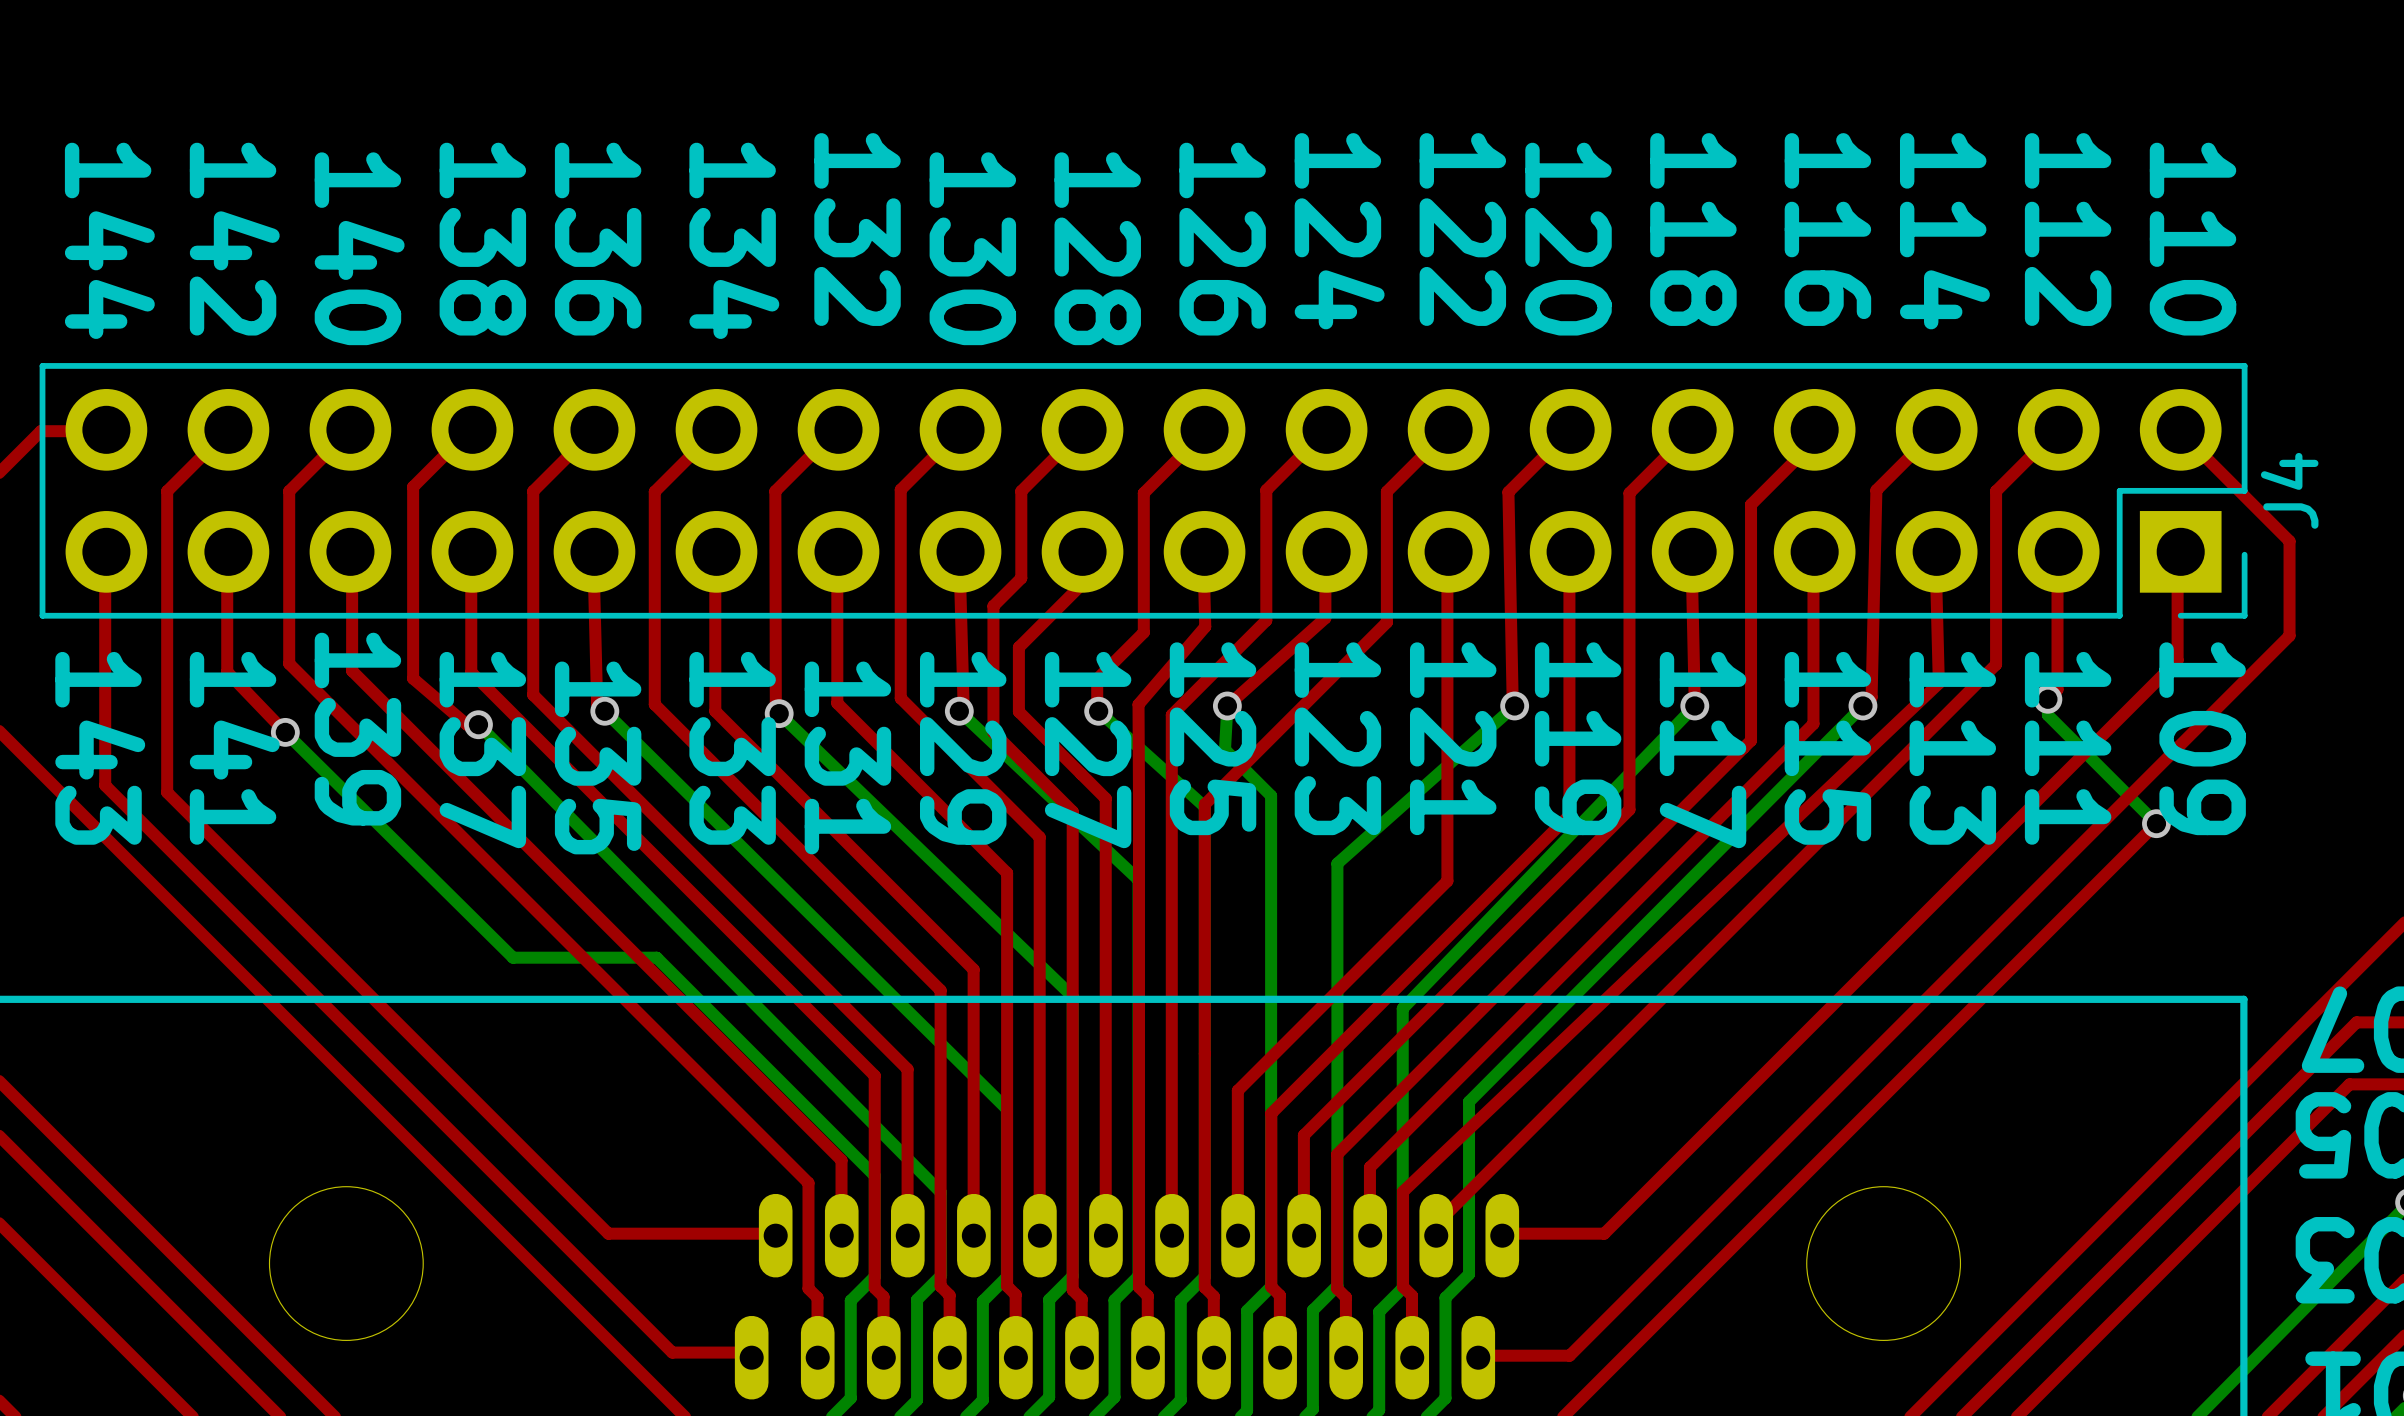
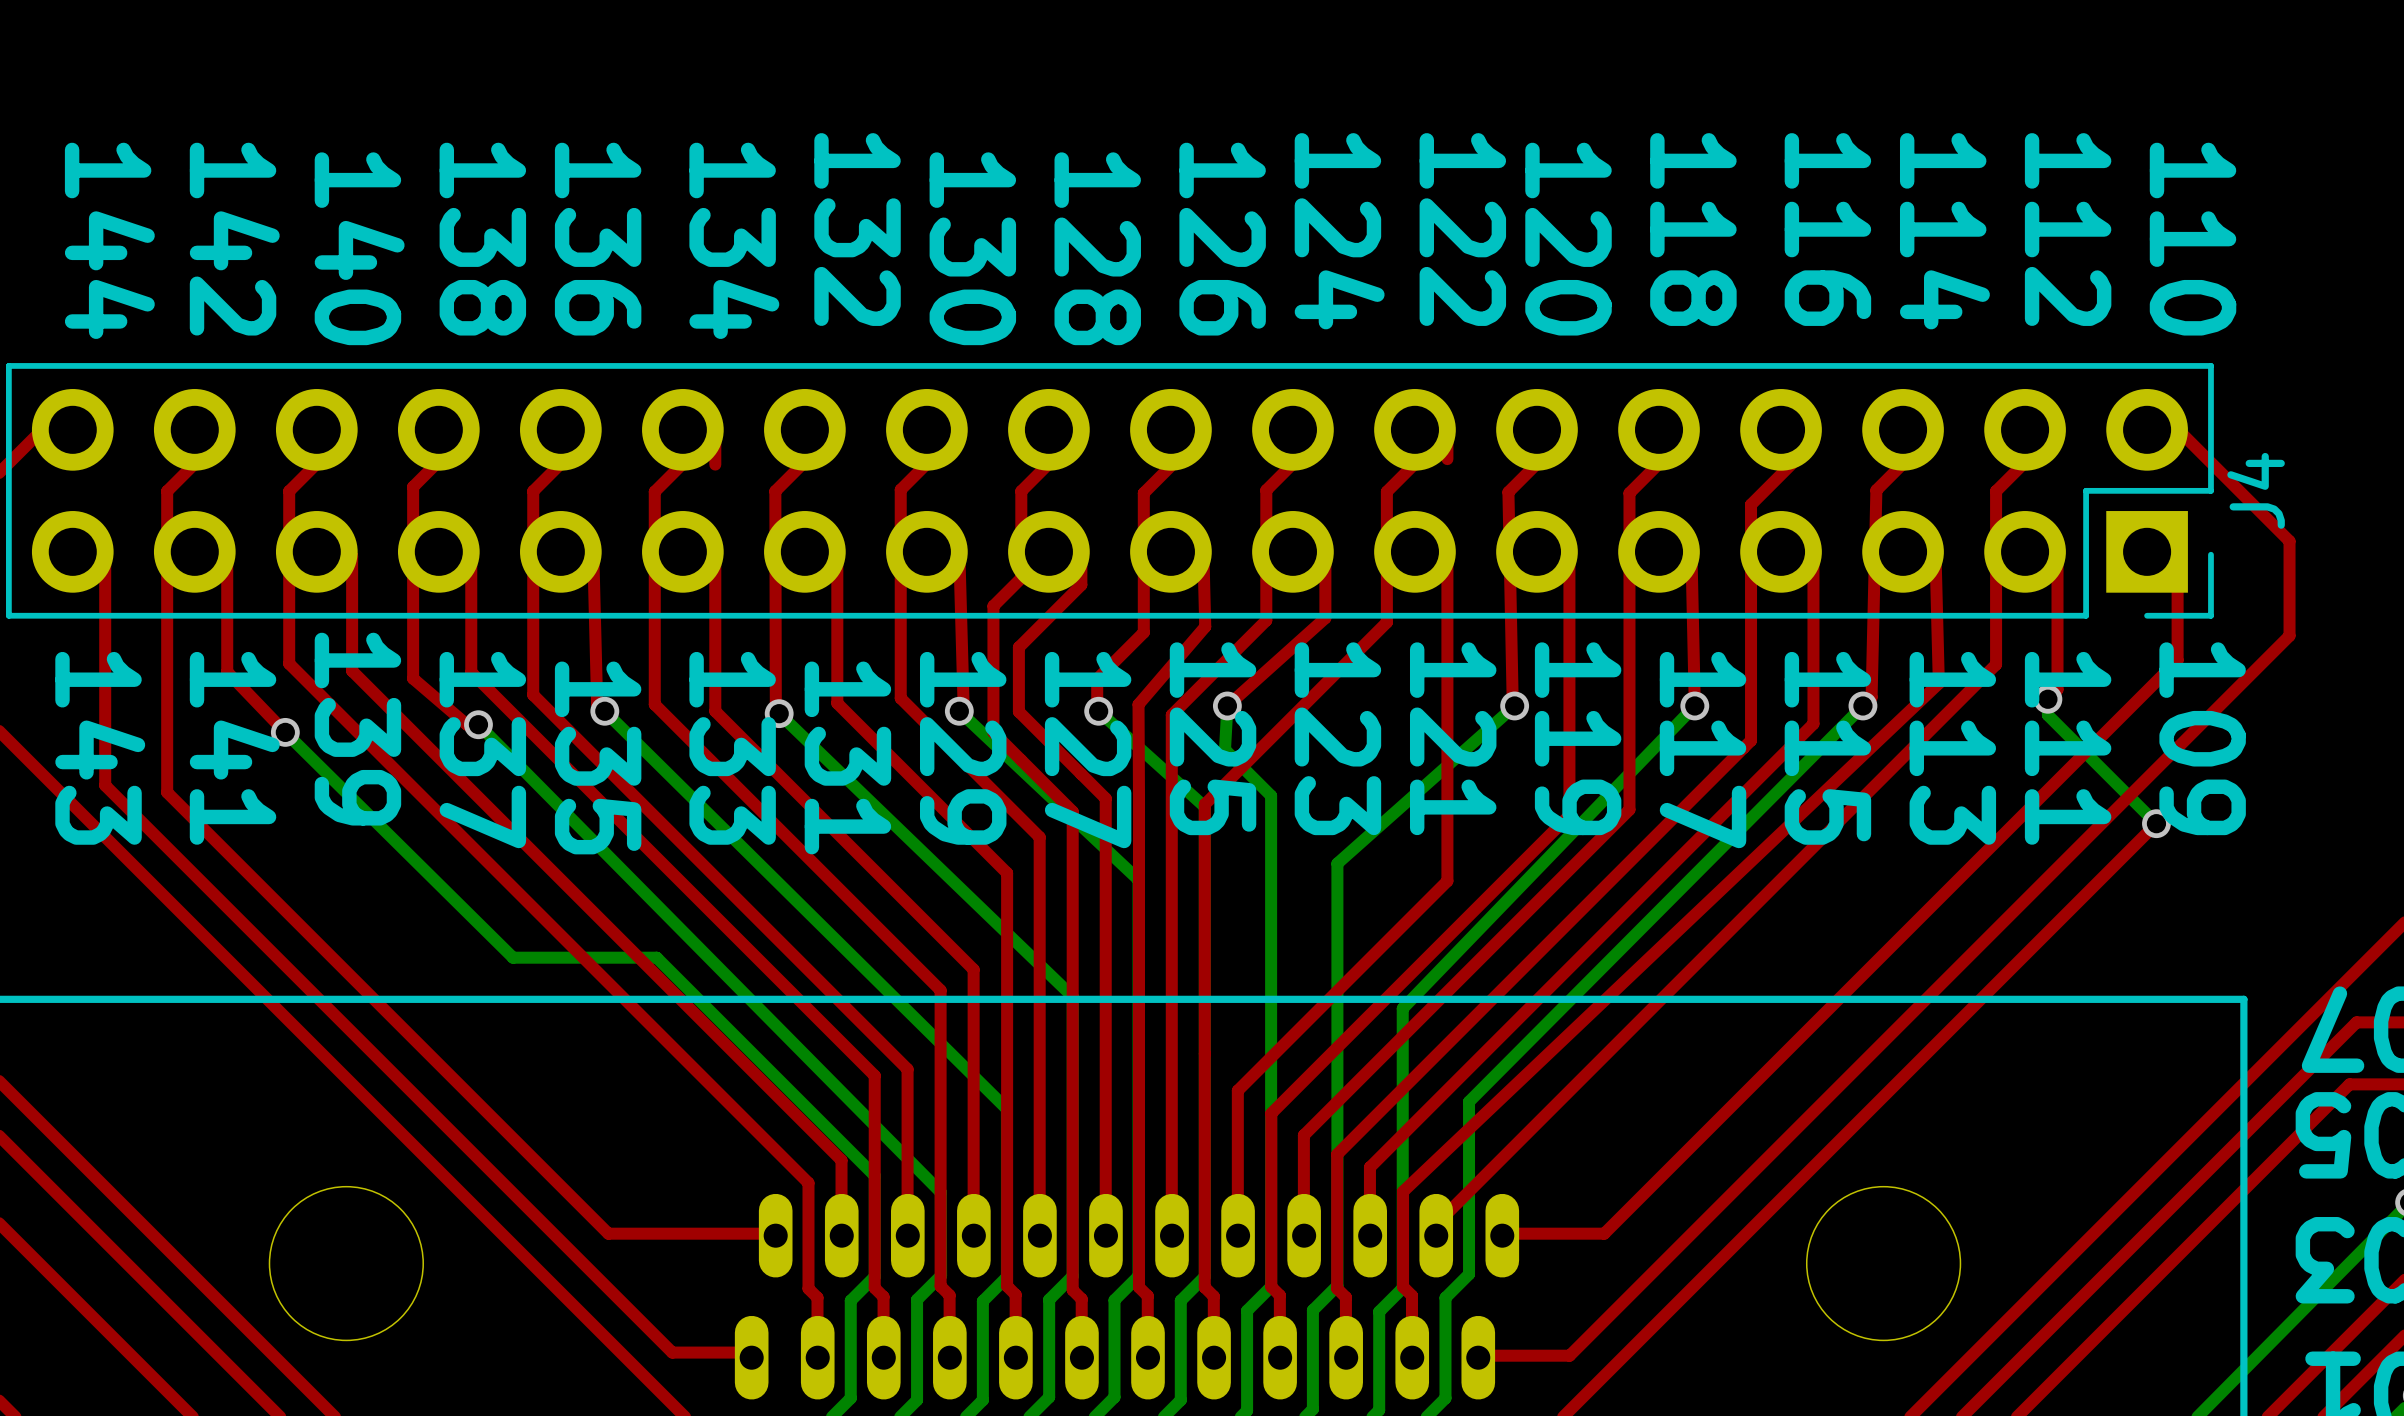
J4 position: (1143, 490) -> (1109, 490)

